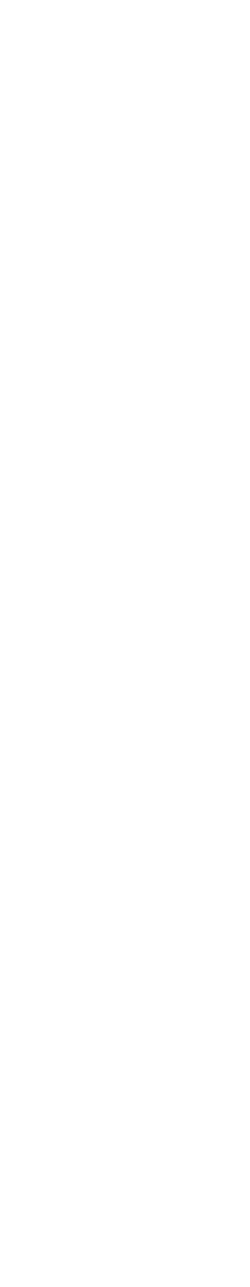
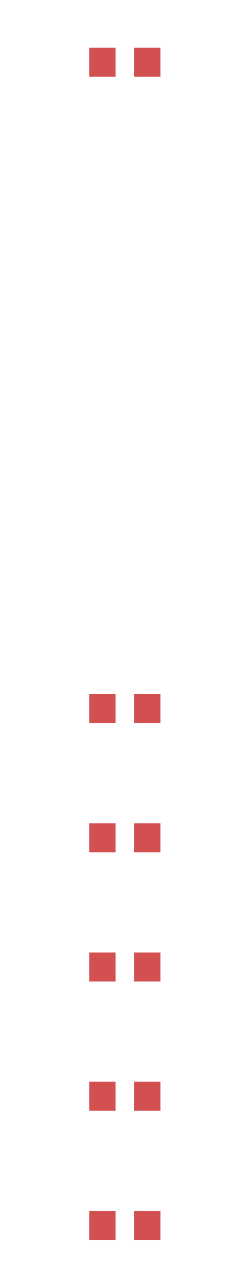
part: none -> (124, 62)
part: none -> (124, 708)
part: none -> (124, 837)
part: none -> (124, 967)
part: none -> (124, 1096)
part: none -> (124, 1225)

